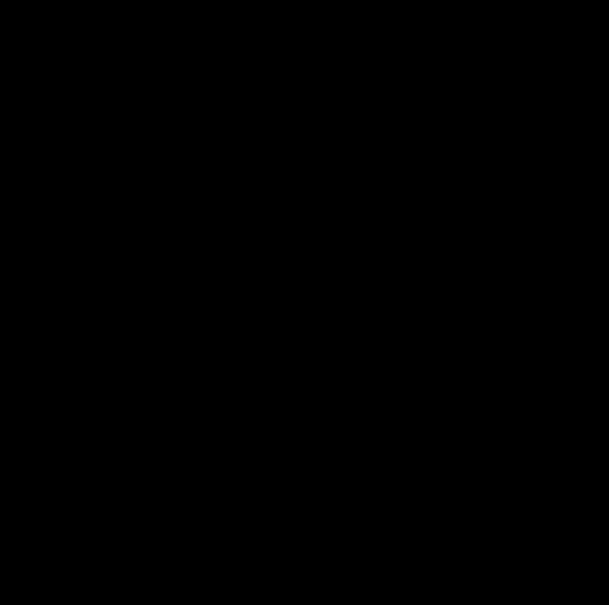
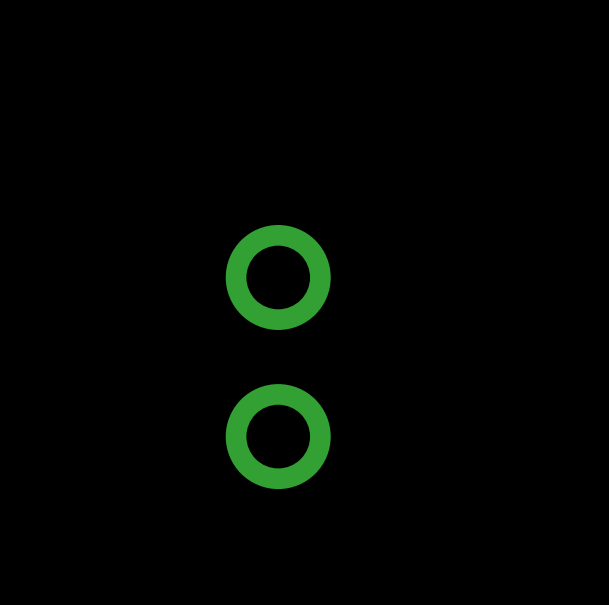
part: none -> (278, 357)

